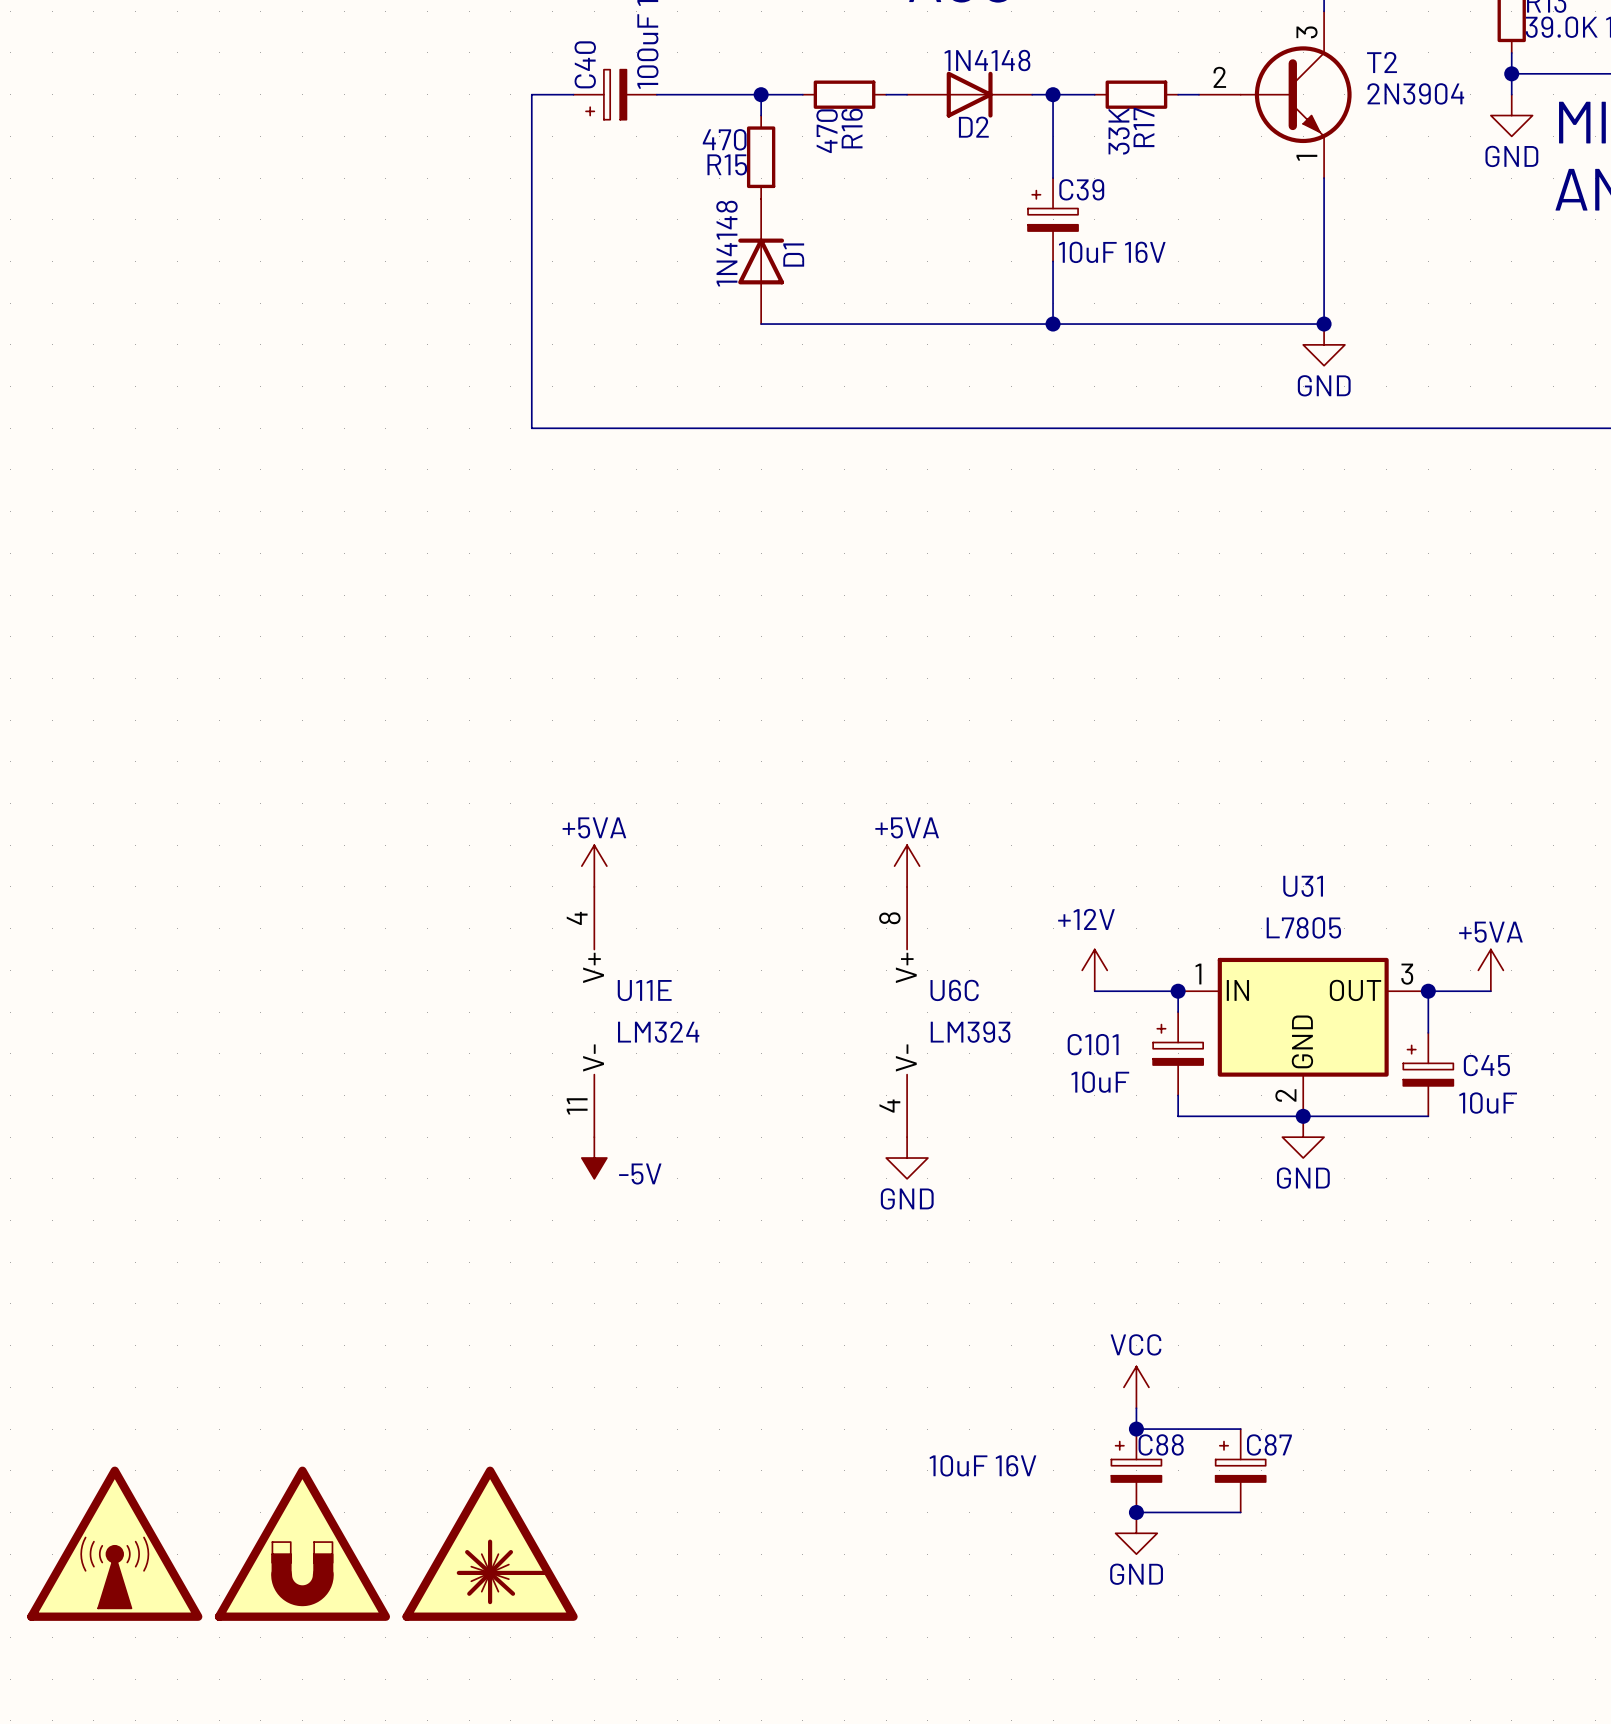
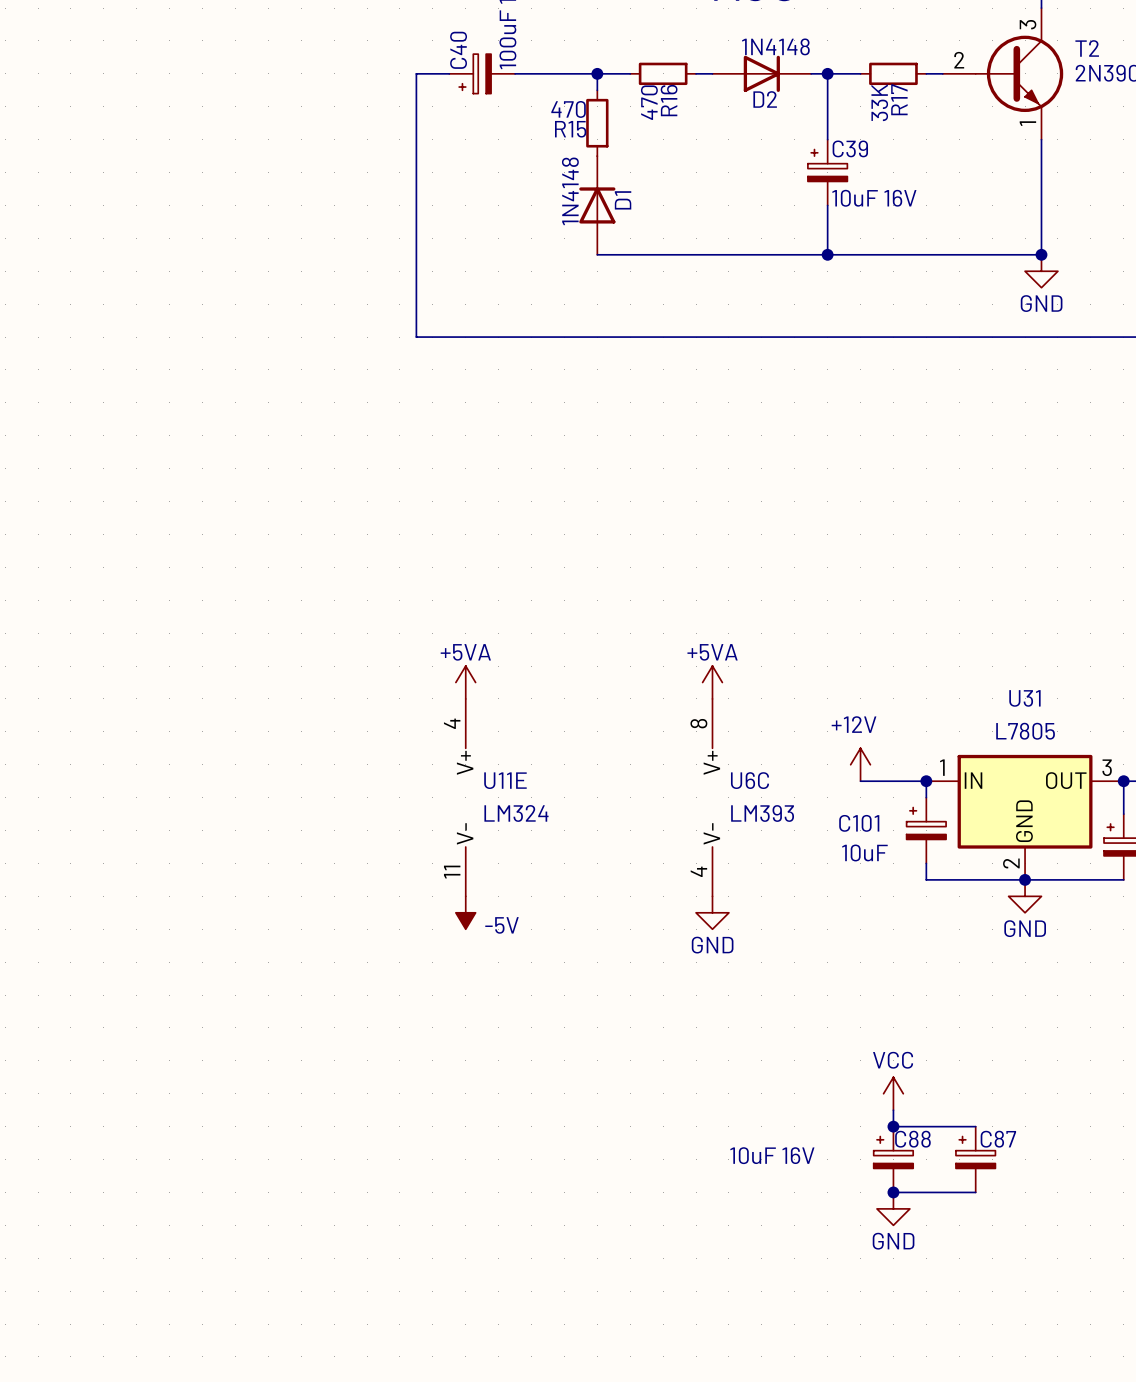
power symbol: (114, 1543) -> none
power symbol: (302, 1543) -> none
power symbol: (490, 1543) -> none

